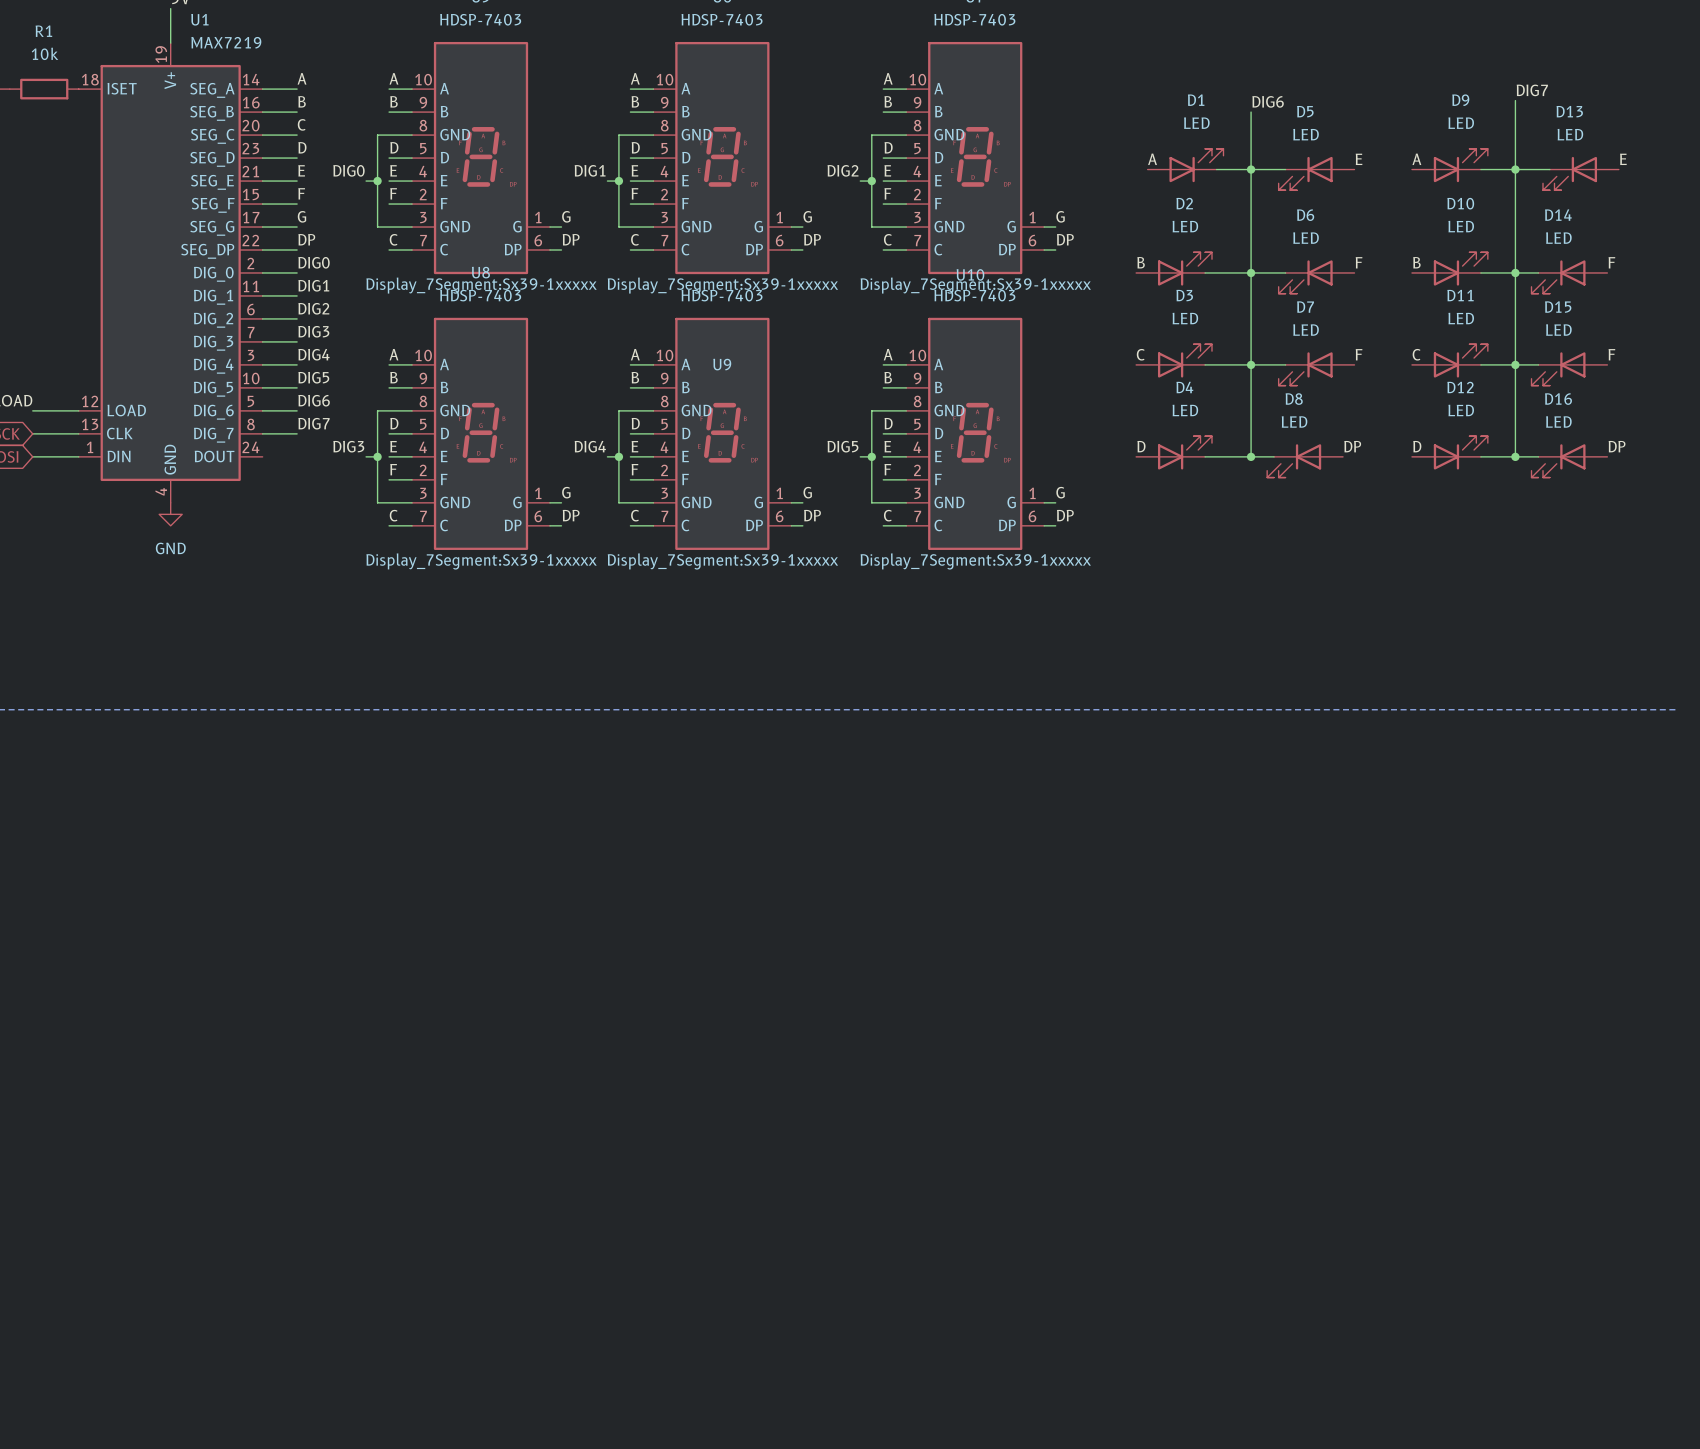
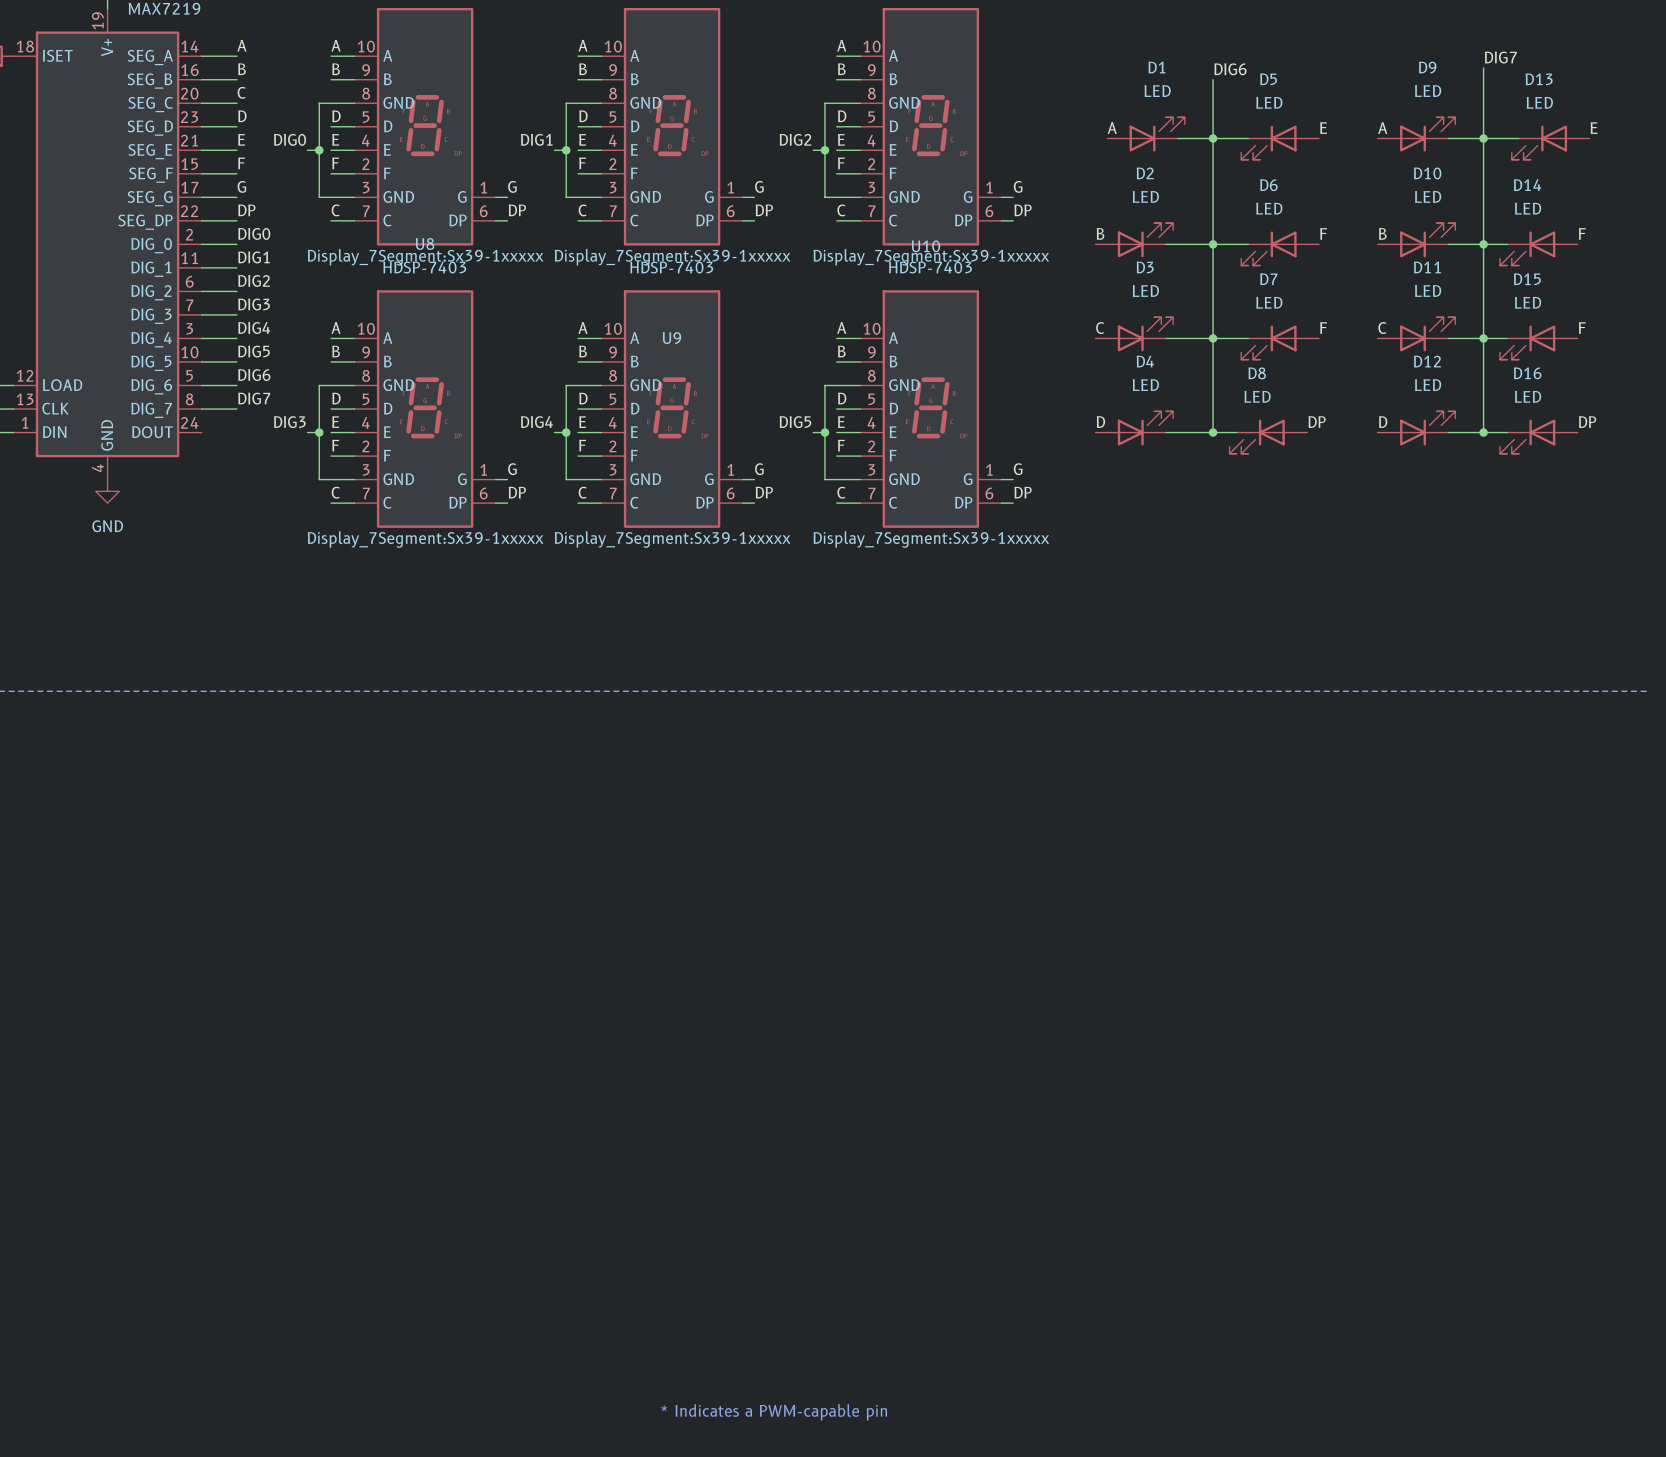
text: none -> * Indicates a PWM-capable pin (774, 1412)

